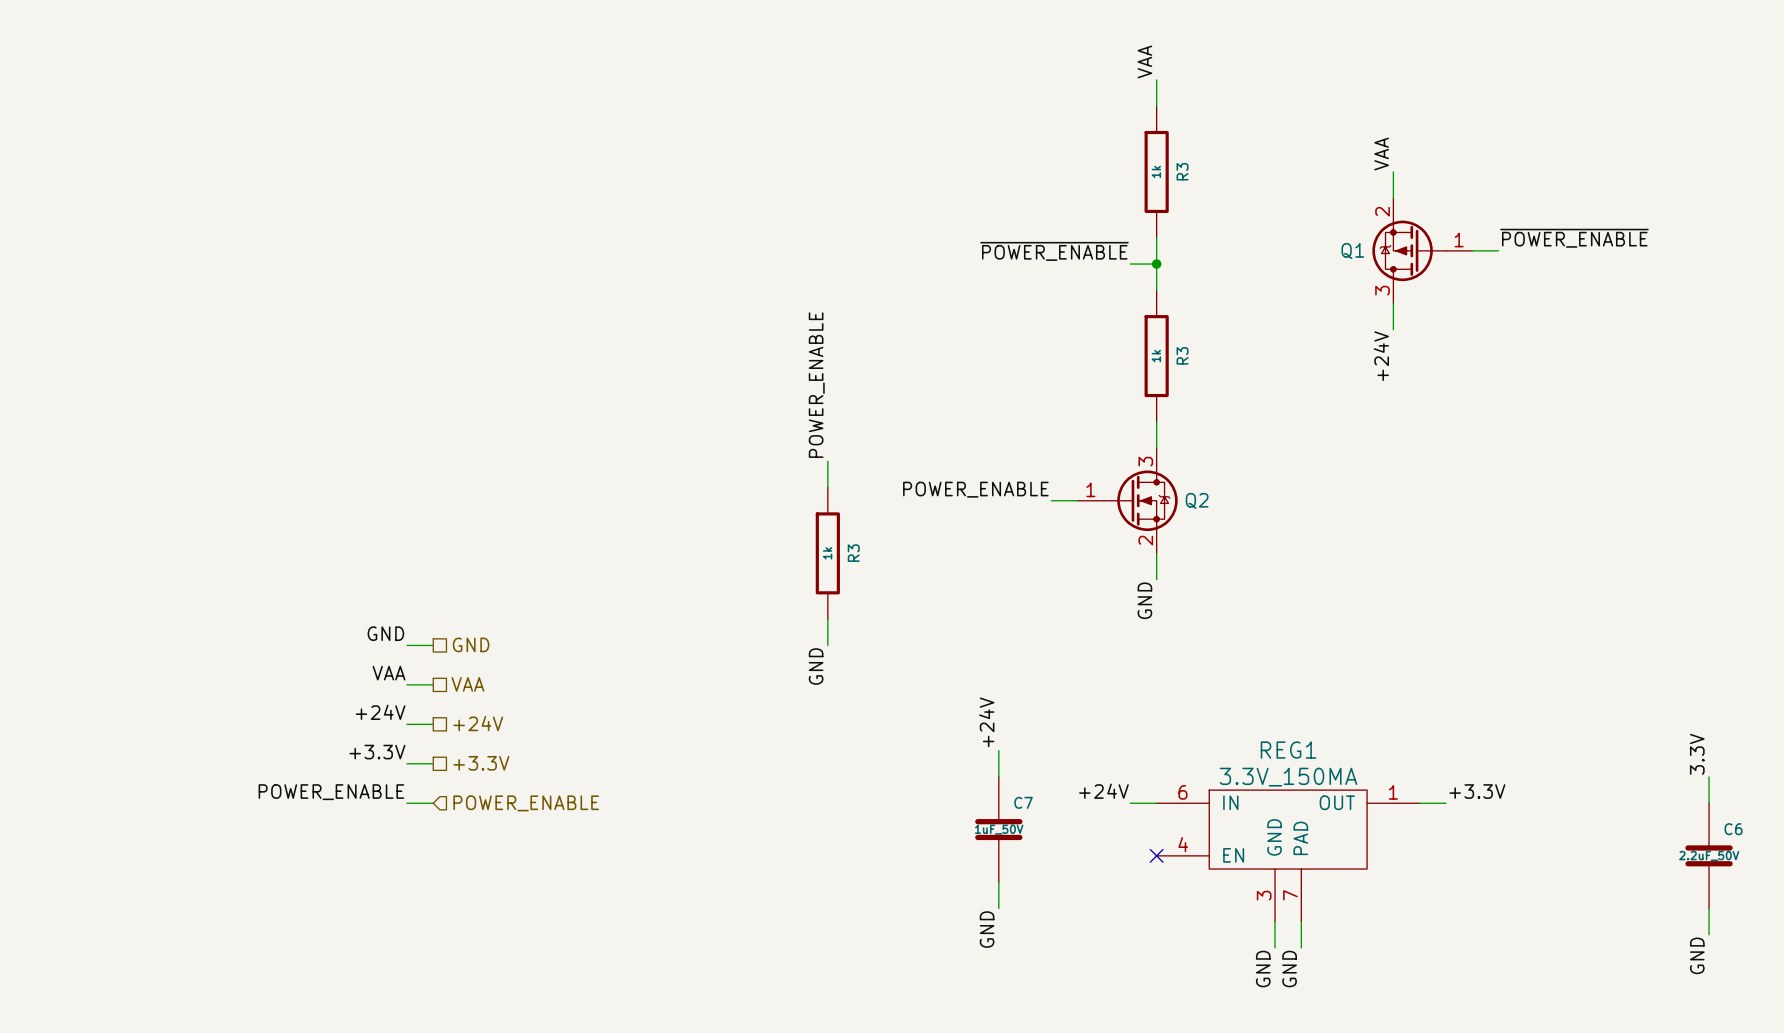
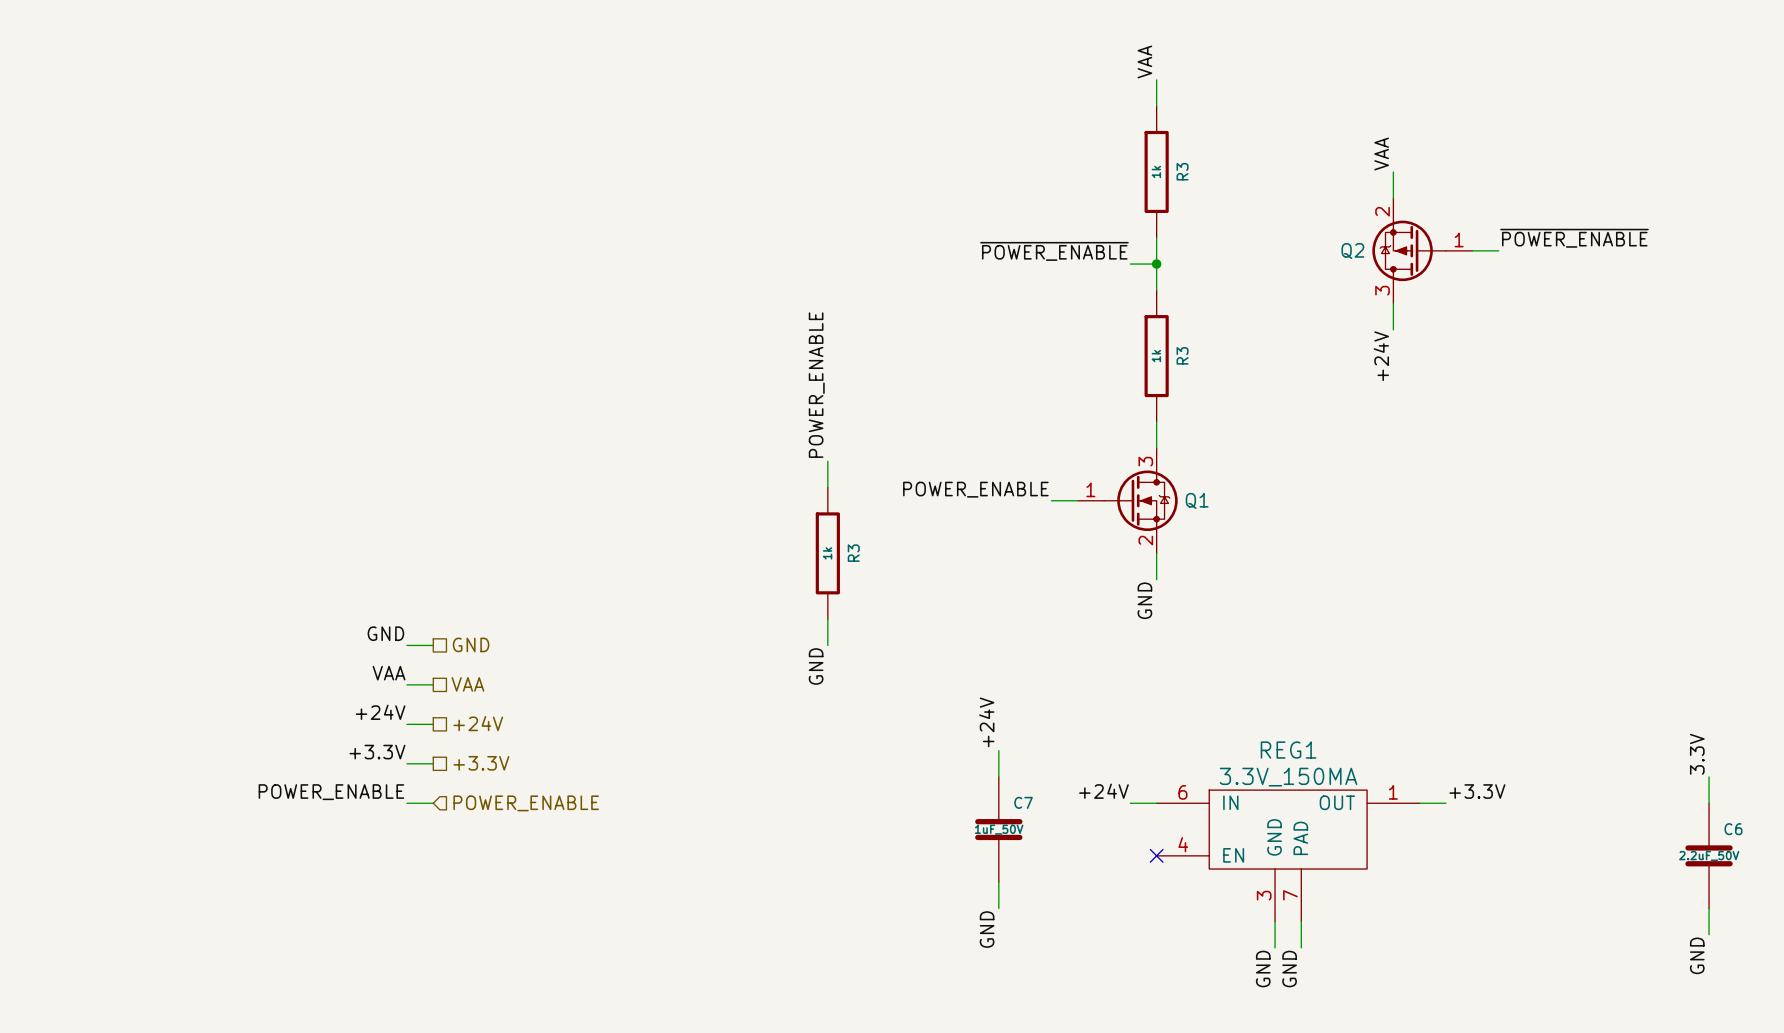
Q1 name: Q1 (1352, 251) -> Q2 (1352, 251)
Q2 name: Q2 (1197, 500) -> Q1 (1197, 500)

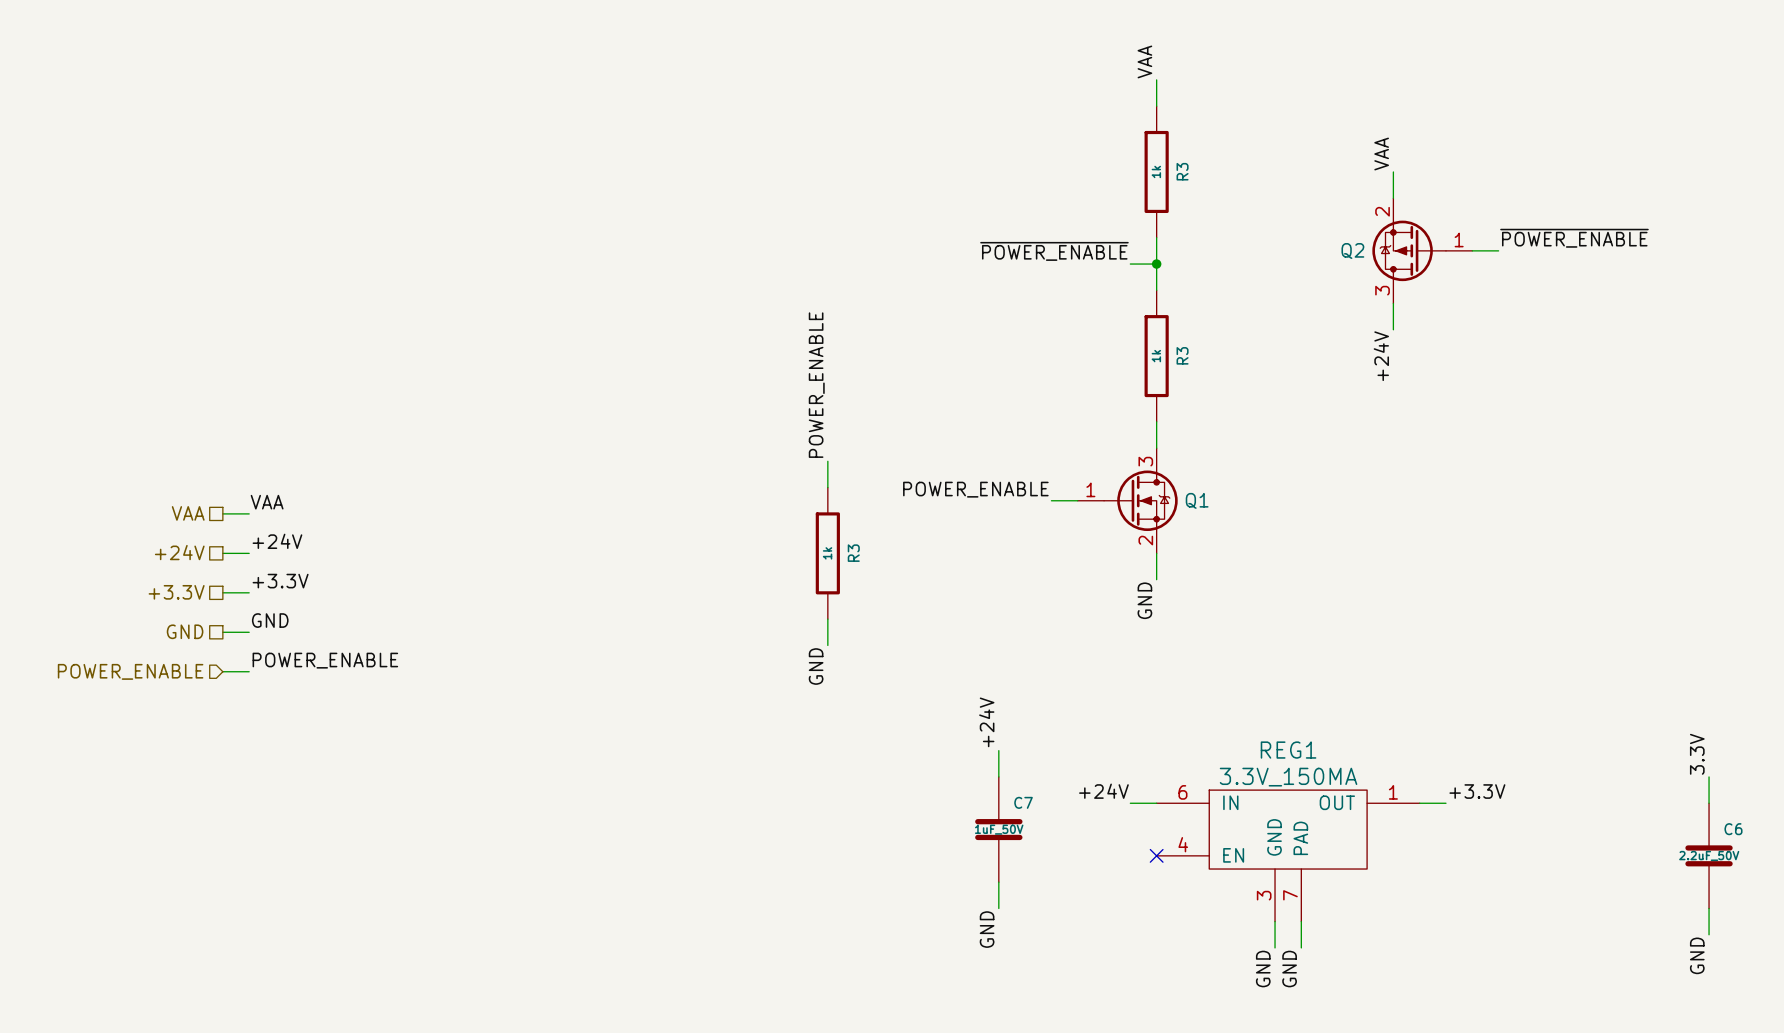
hierarchical label: none -> VAA (188, 513)
hierarchical label: none -> +24V (179, 552)
hierarchical label: none -> +3.3V (176, 592)
label position: GND (385, 633) -> GND (270, 620)
hierarchical label rotation: 0° (471, 644) -> 180° (185, 631)
hierarchical label position: GND (471, 644) -> GND (185, 631)
wire: (406, 645) (433, 645) -> (222, 513) (249, 513)
hierarchical label: none -> POWER_ENABLE (130, 671)
label position: VAA (389, 673) -> VAA (267, 502)
wire: (406, 684) (433, 684) -> (222, 553) (249, 553)
hierarchical label: VAA (467, 684) -> none
label position: +24V (380, 712) -> +24V (277, 541)
hierarchical label: +24V (478, 723) -> none
wire: (406, 724) (433, 724) -> (222, 592) (249, 592)
label position: +3.3V (377, 752) -> +3.3V (280, 581)
wire: (406, 763) (433, 763) -> (222, 632) (249, 632)
hierarchical label: +3.3V (481, 763) -> none
label position: POWER_ENABLE (331, 792) -> POWER_ENABLE (325, 660)
wire: (406, 803) (433, 803) -> (222, 671) (249, 671)
hierarchical label: POWER_ENABLE (526, 803) -> none

